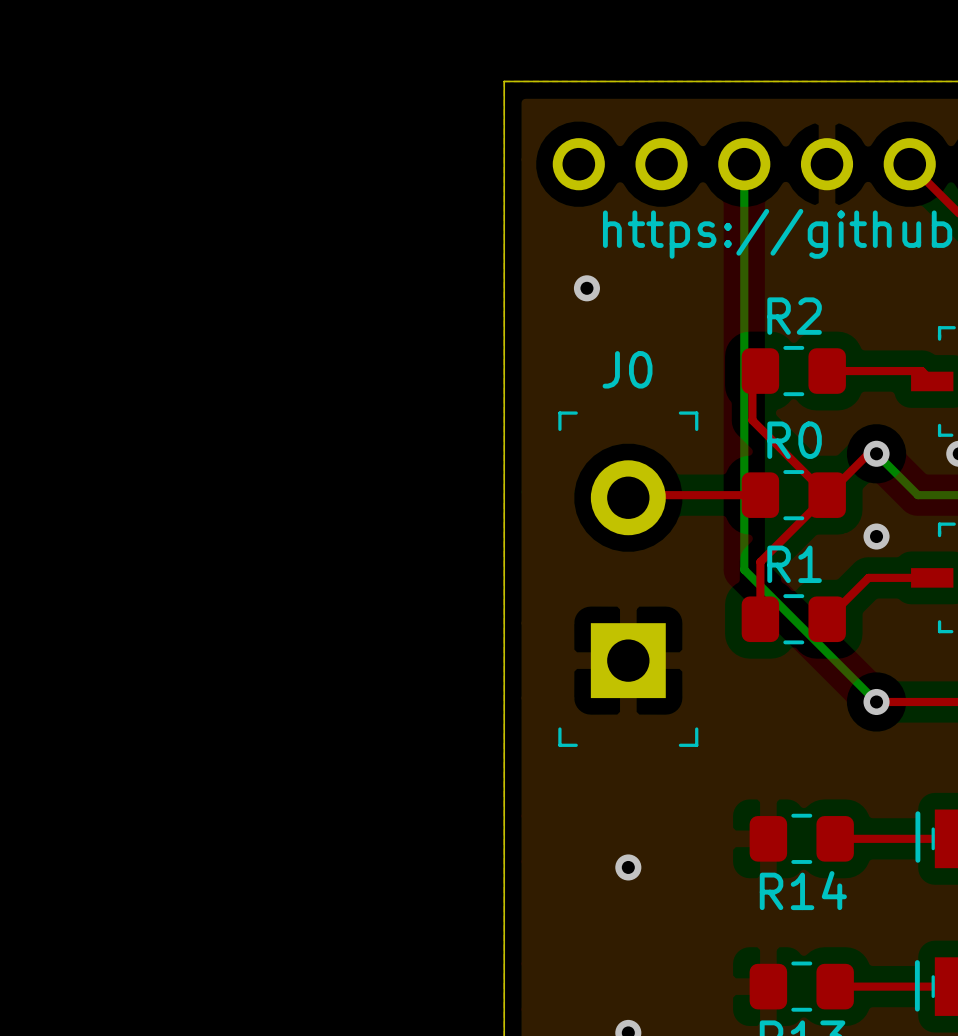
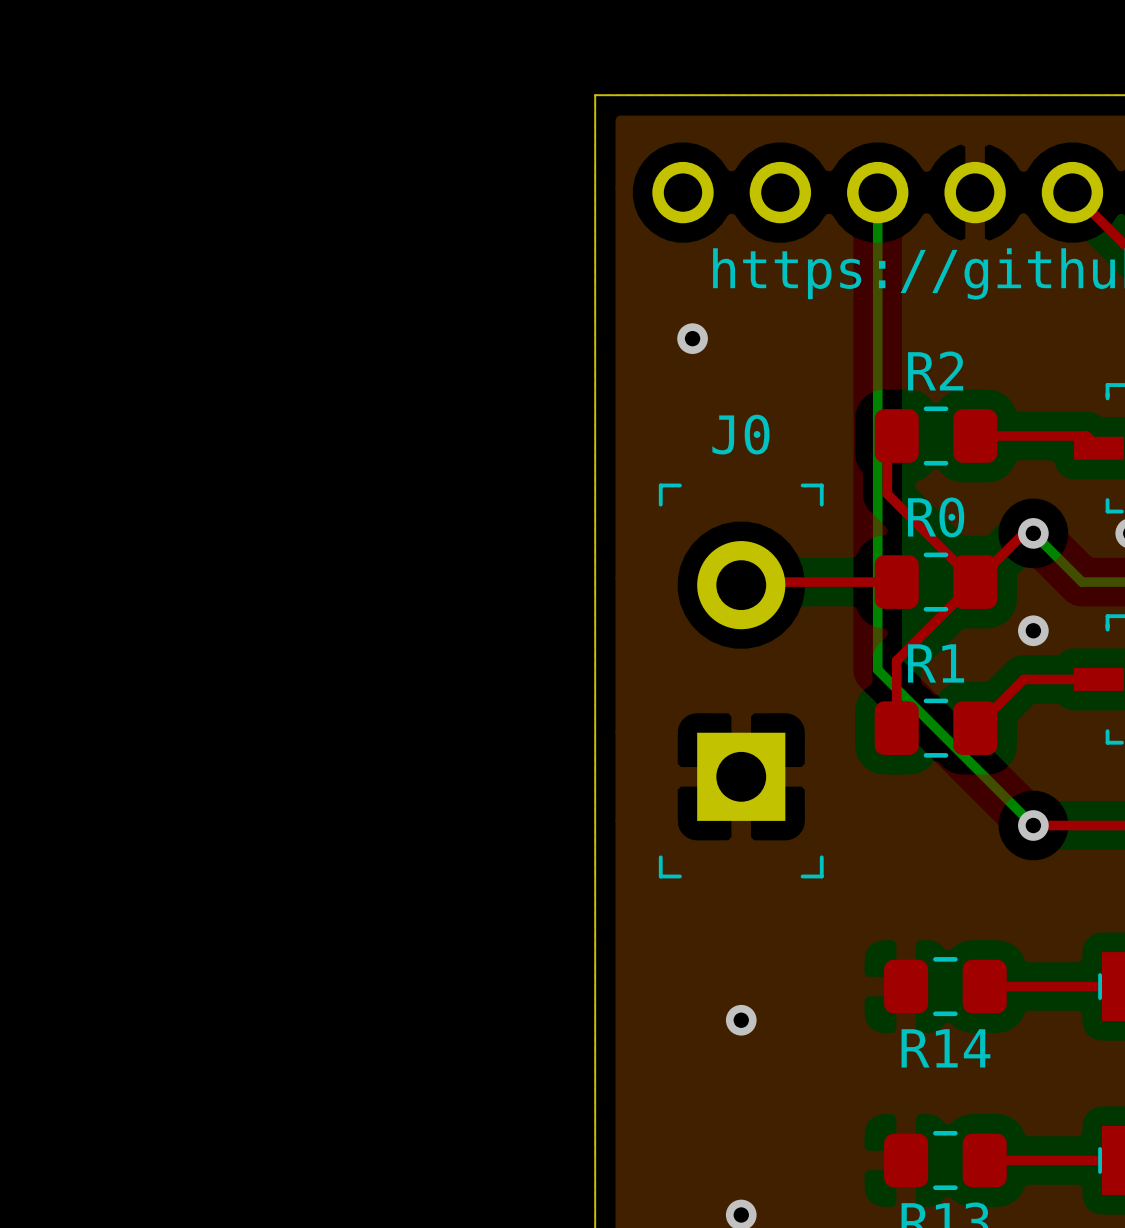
text: | (917, 837) -> none
text: | (917, 985) -> none

